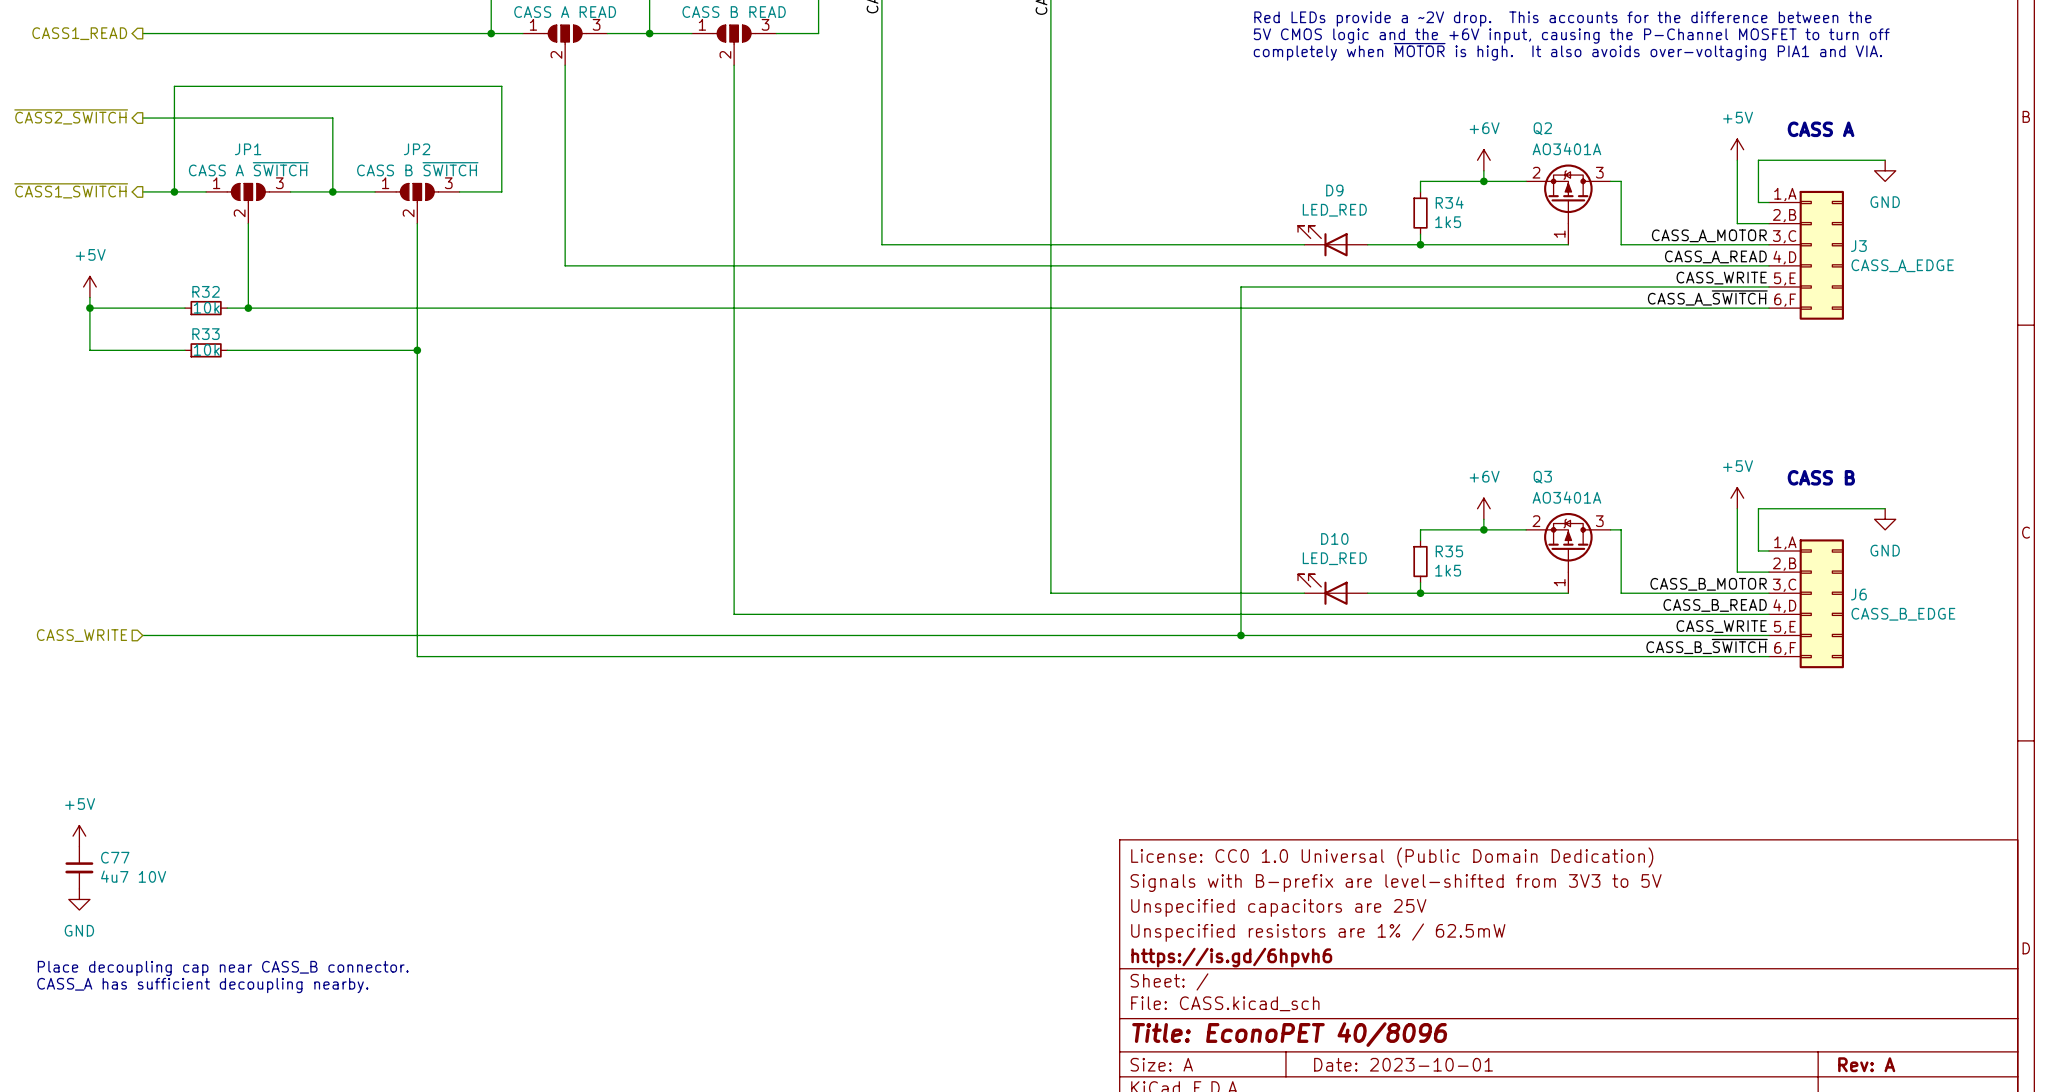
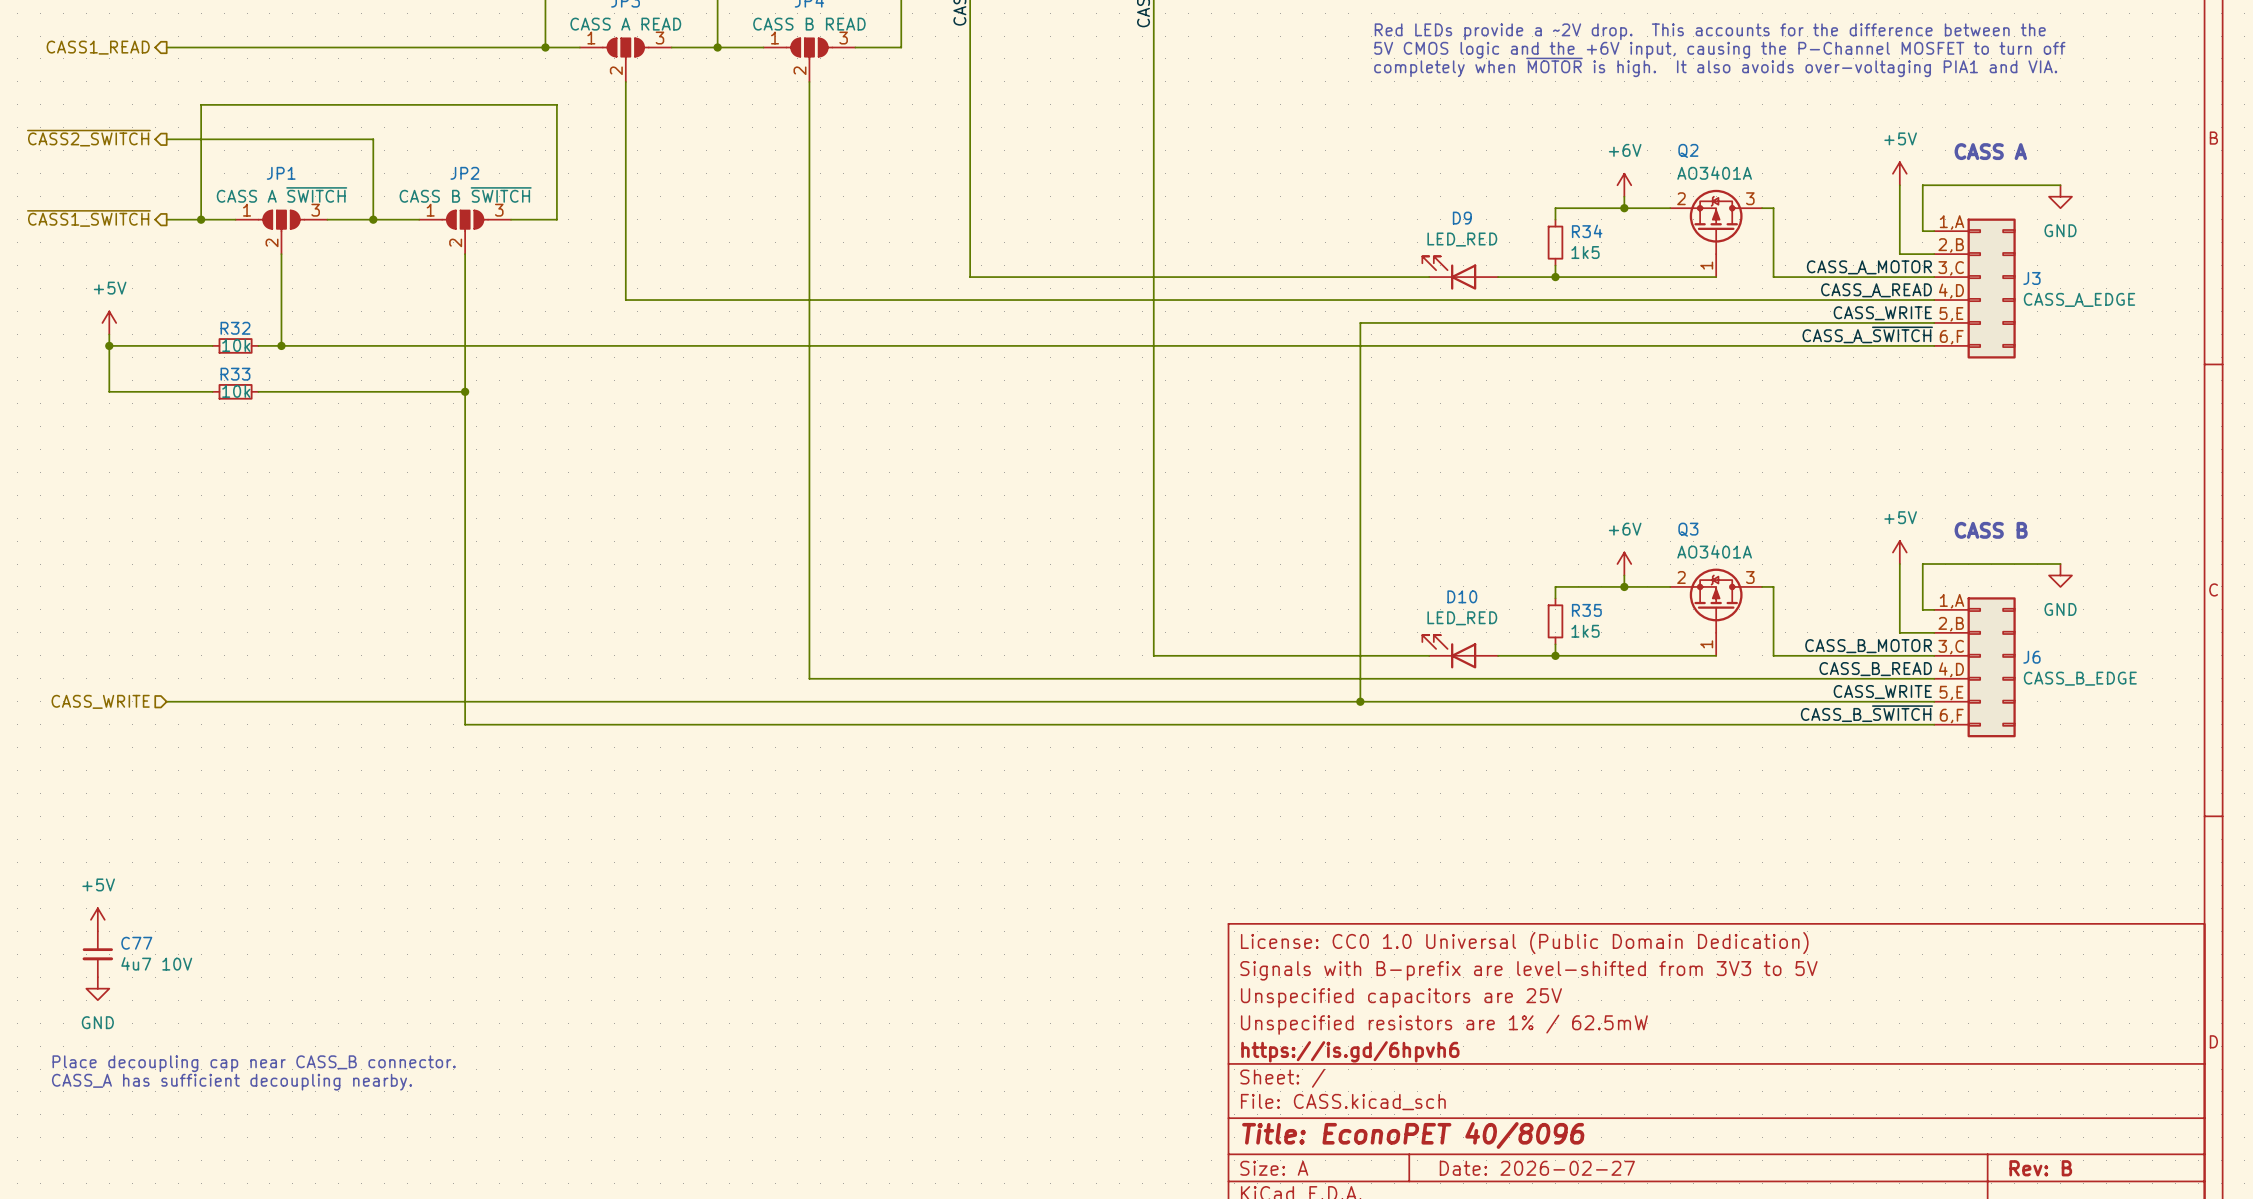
title block: Date: 2023-10-01 (1403, 1064) -> Date: 2026-02-27 (1537, 1168)
title block: Rev: A (1866, 1064) -> Rev: B (2040, 1168)

